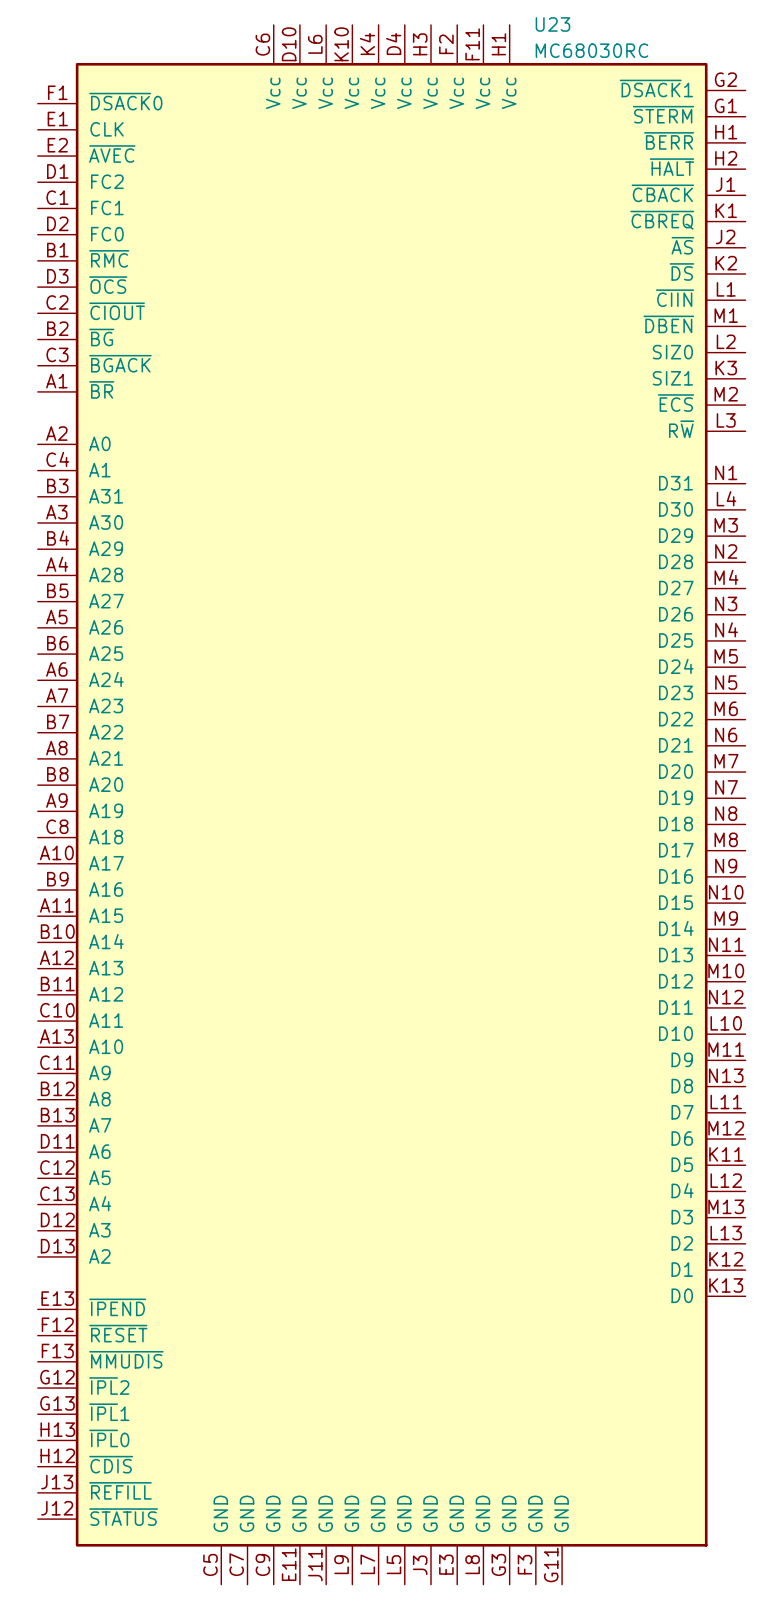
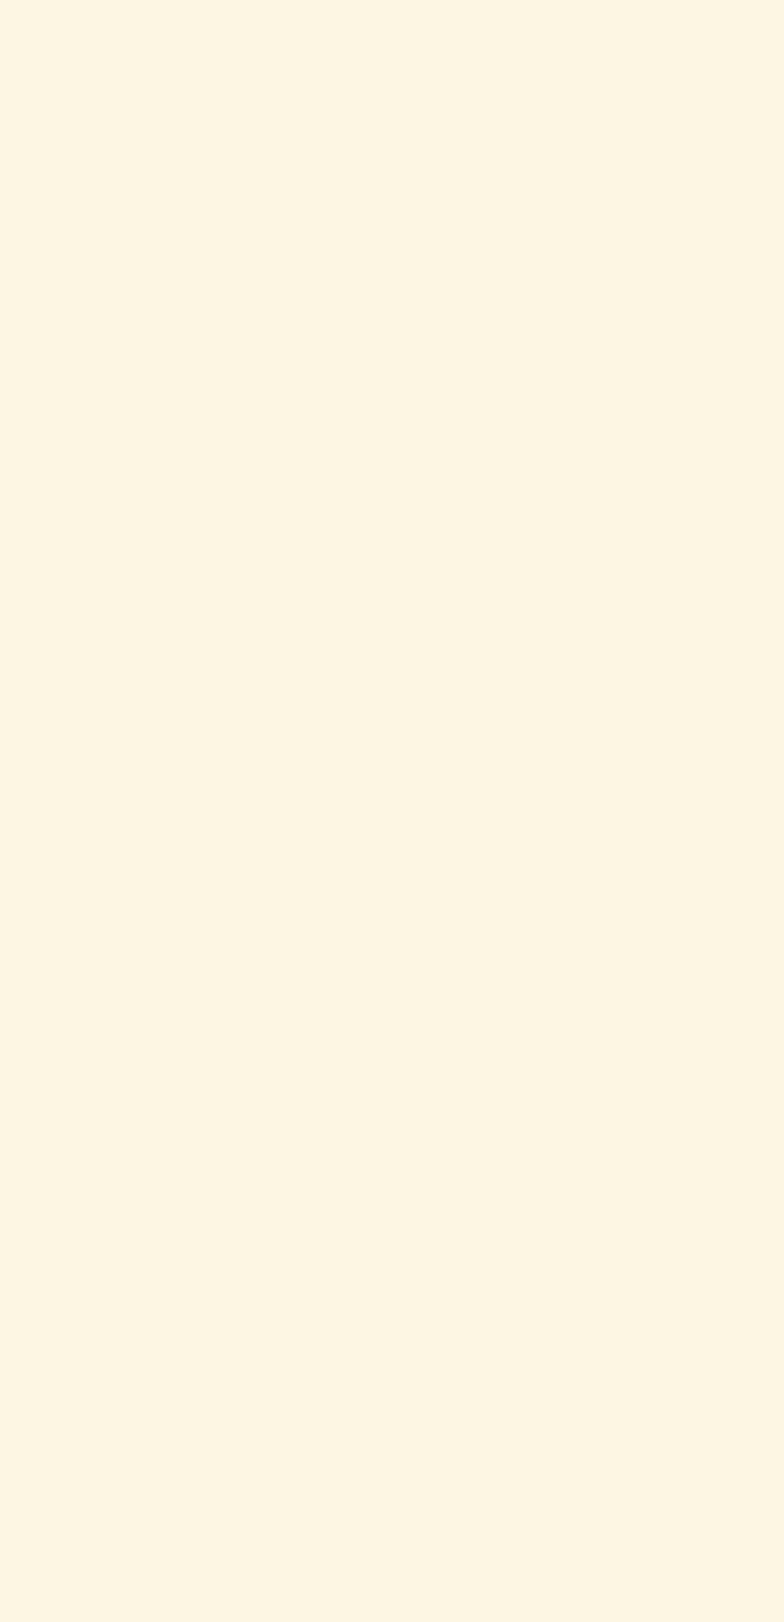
U23: MC68030RC (391, 804) -> none

